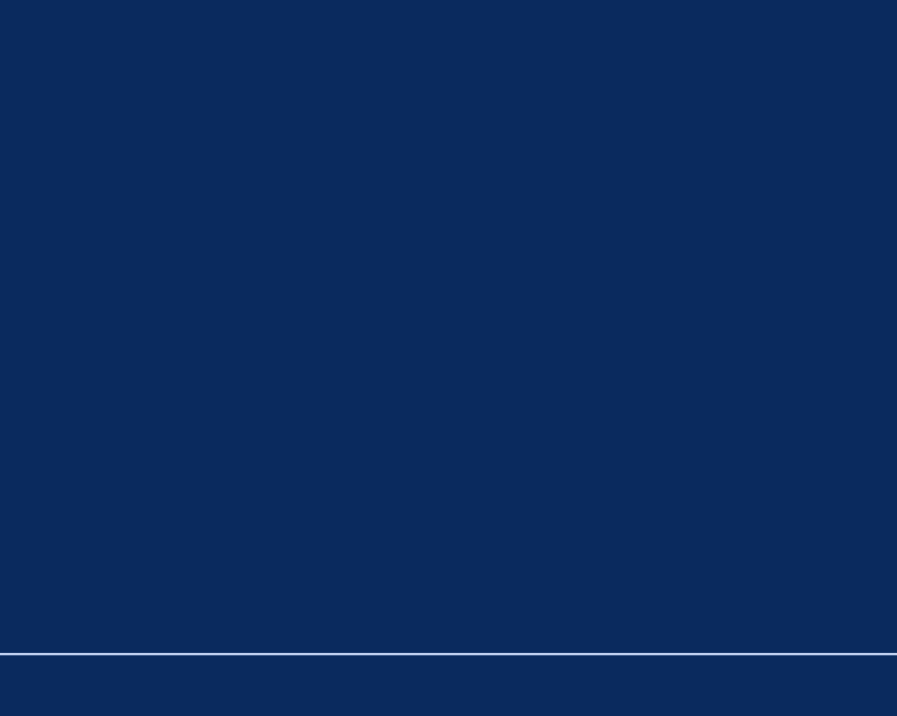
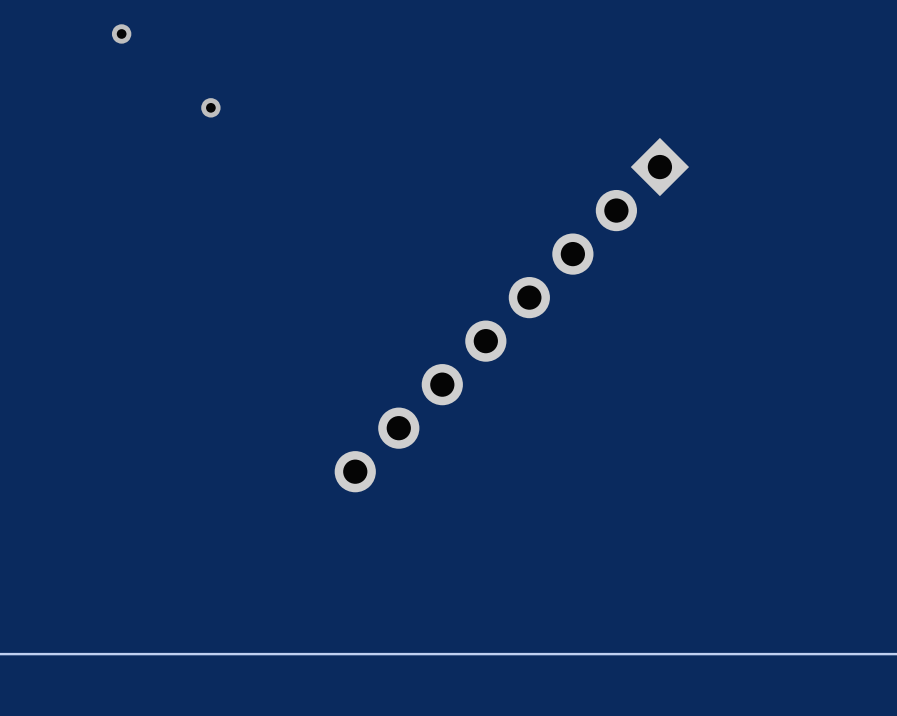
via: none -> (121, 33)
via: none -> (210, 107)
part: none -> (511, 315)

